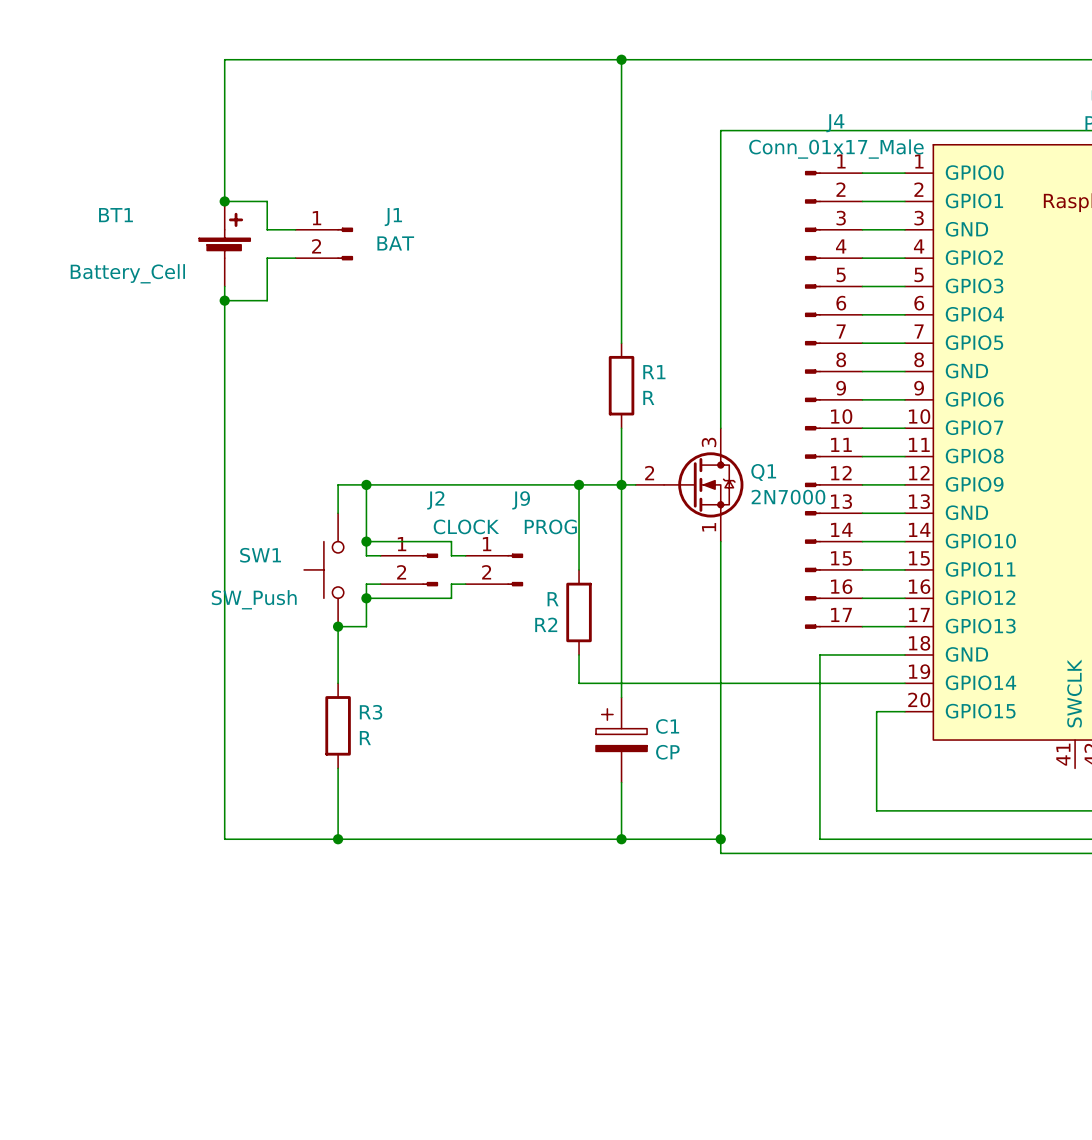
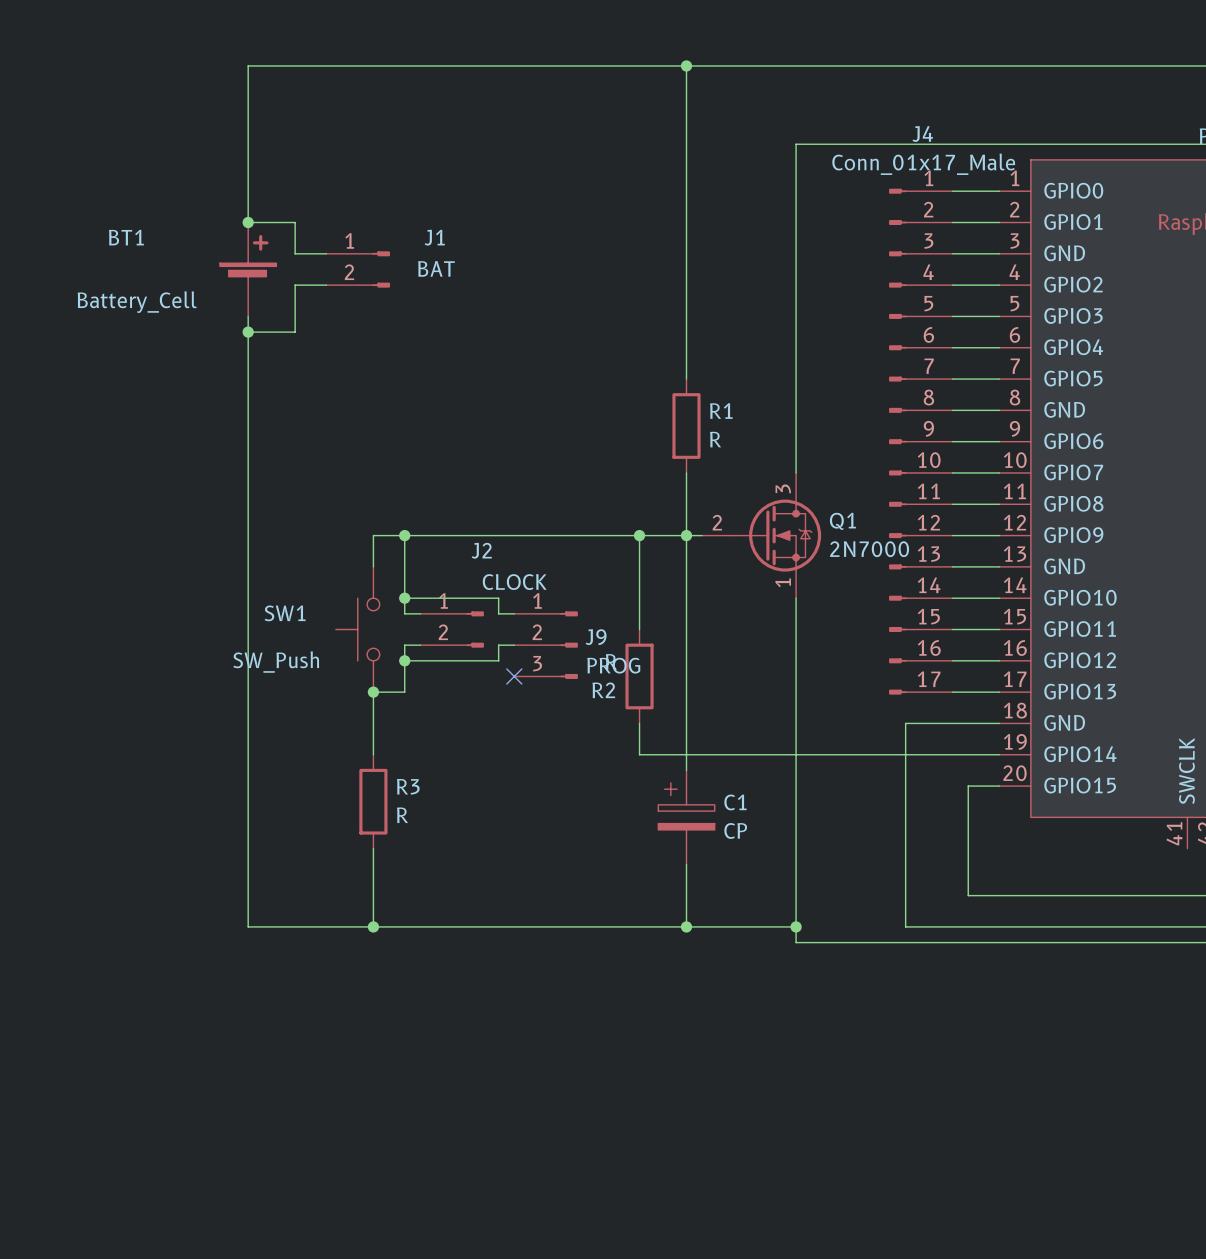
J9 name position: J9 (521, 500) -> J9 (596, 637)
J9 value position: PROG (550, 526) -> PROG (613, 665)
J9 symbol: [465, 553, 524, 587] -> [514, 611, 578, 679]
no-connect mark: none -> (514, 676)

